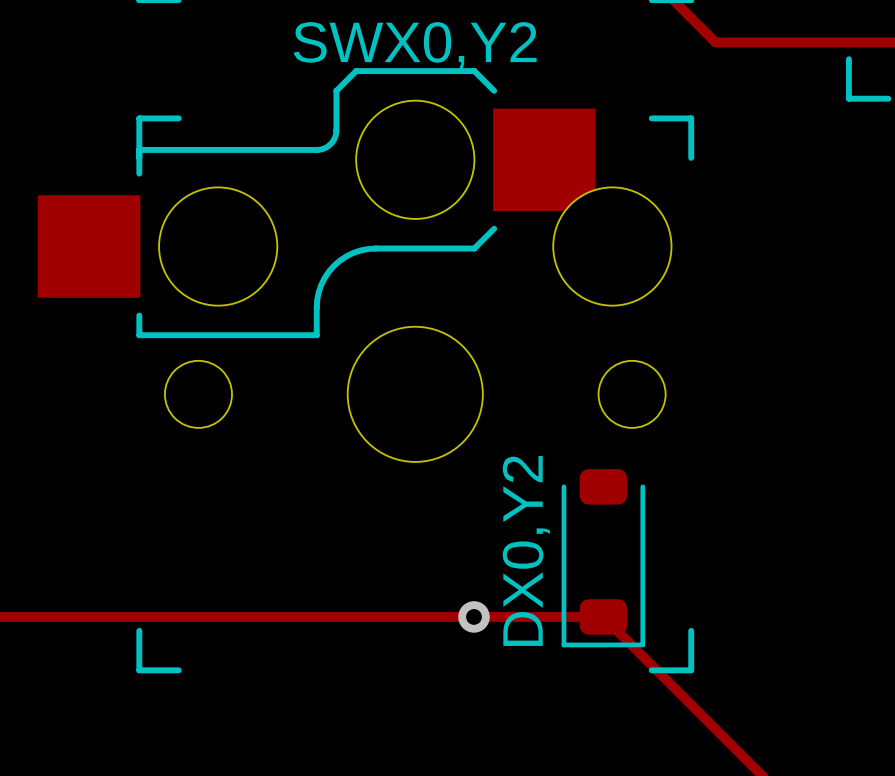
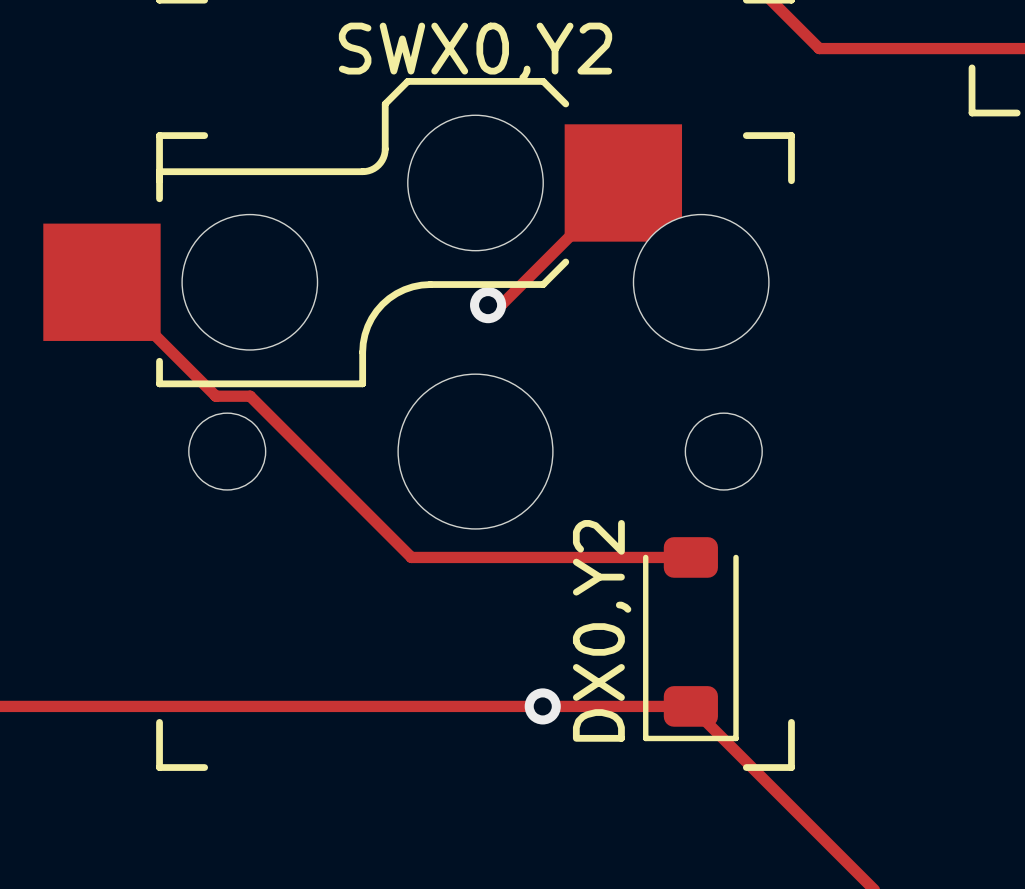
track: none -> (623, 182) (501, 305) (488, 305)
track: none -> (101, 282) (215, 396) (250, 396) (411, 557) (690, 557)
via: none -> (488, 305)

